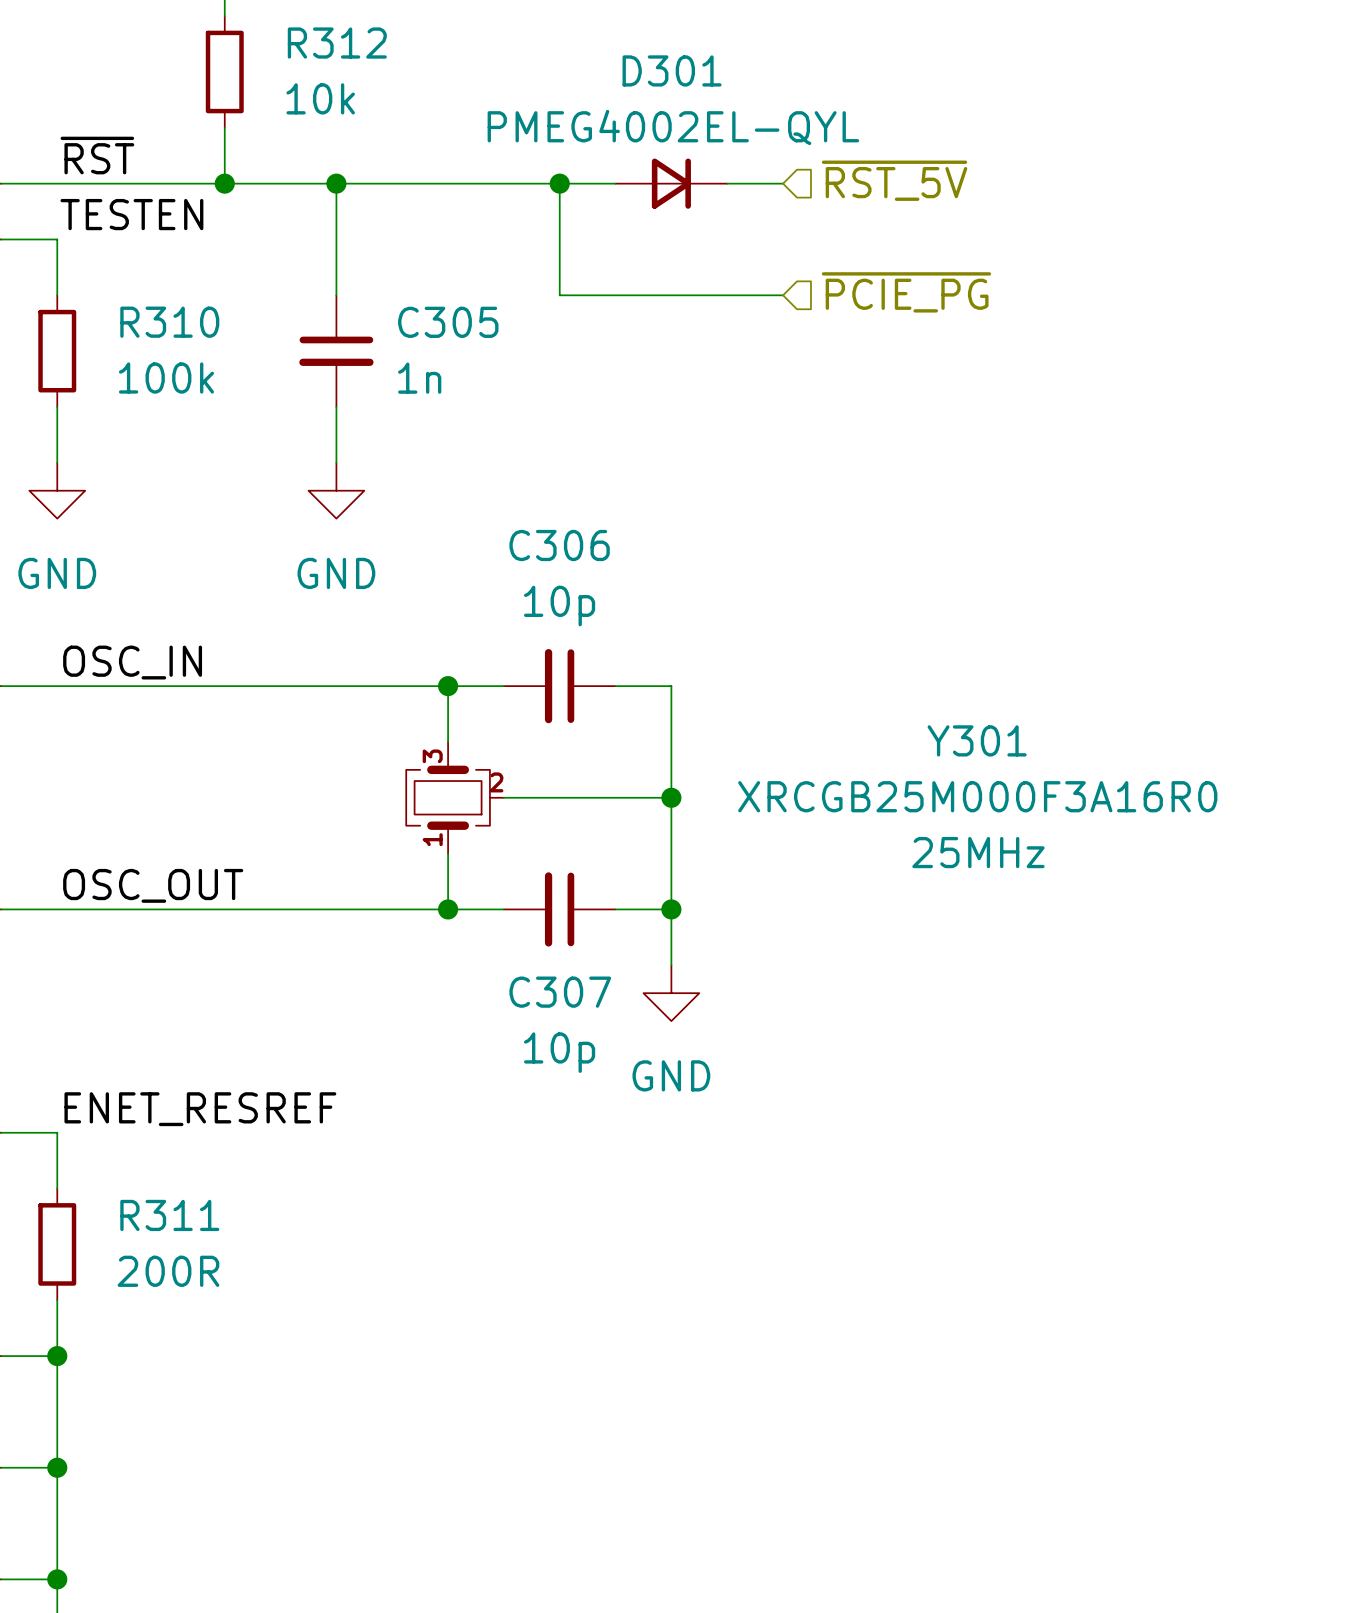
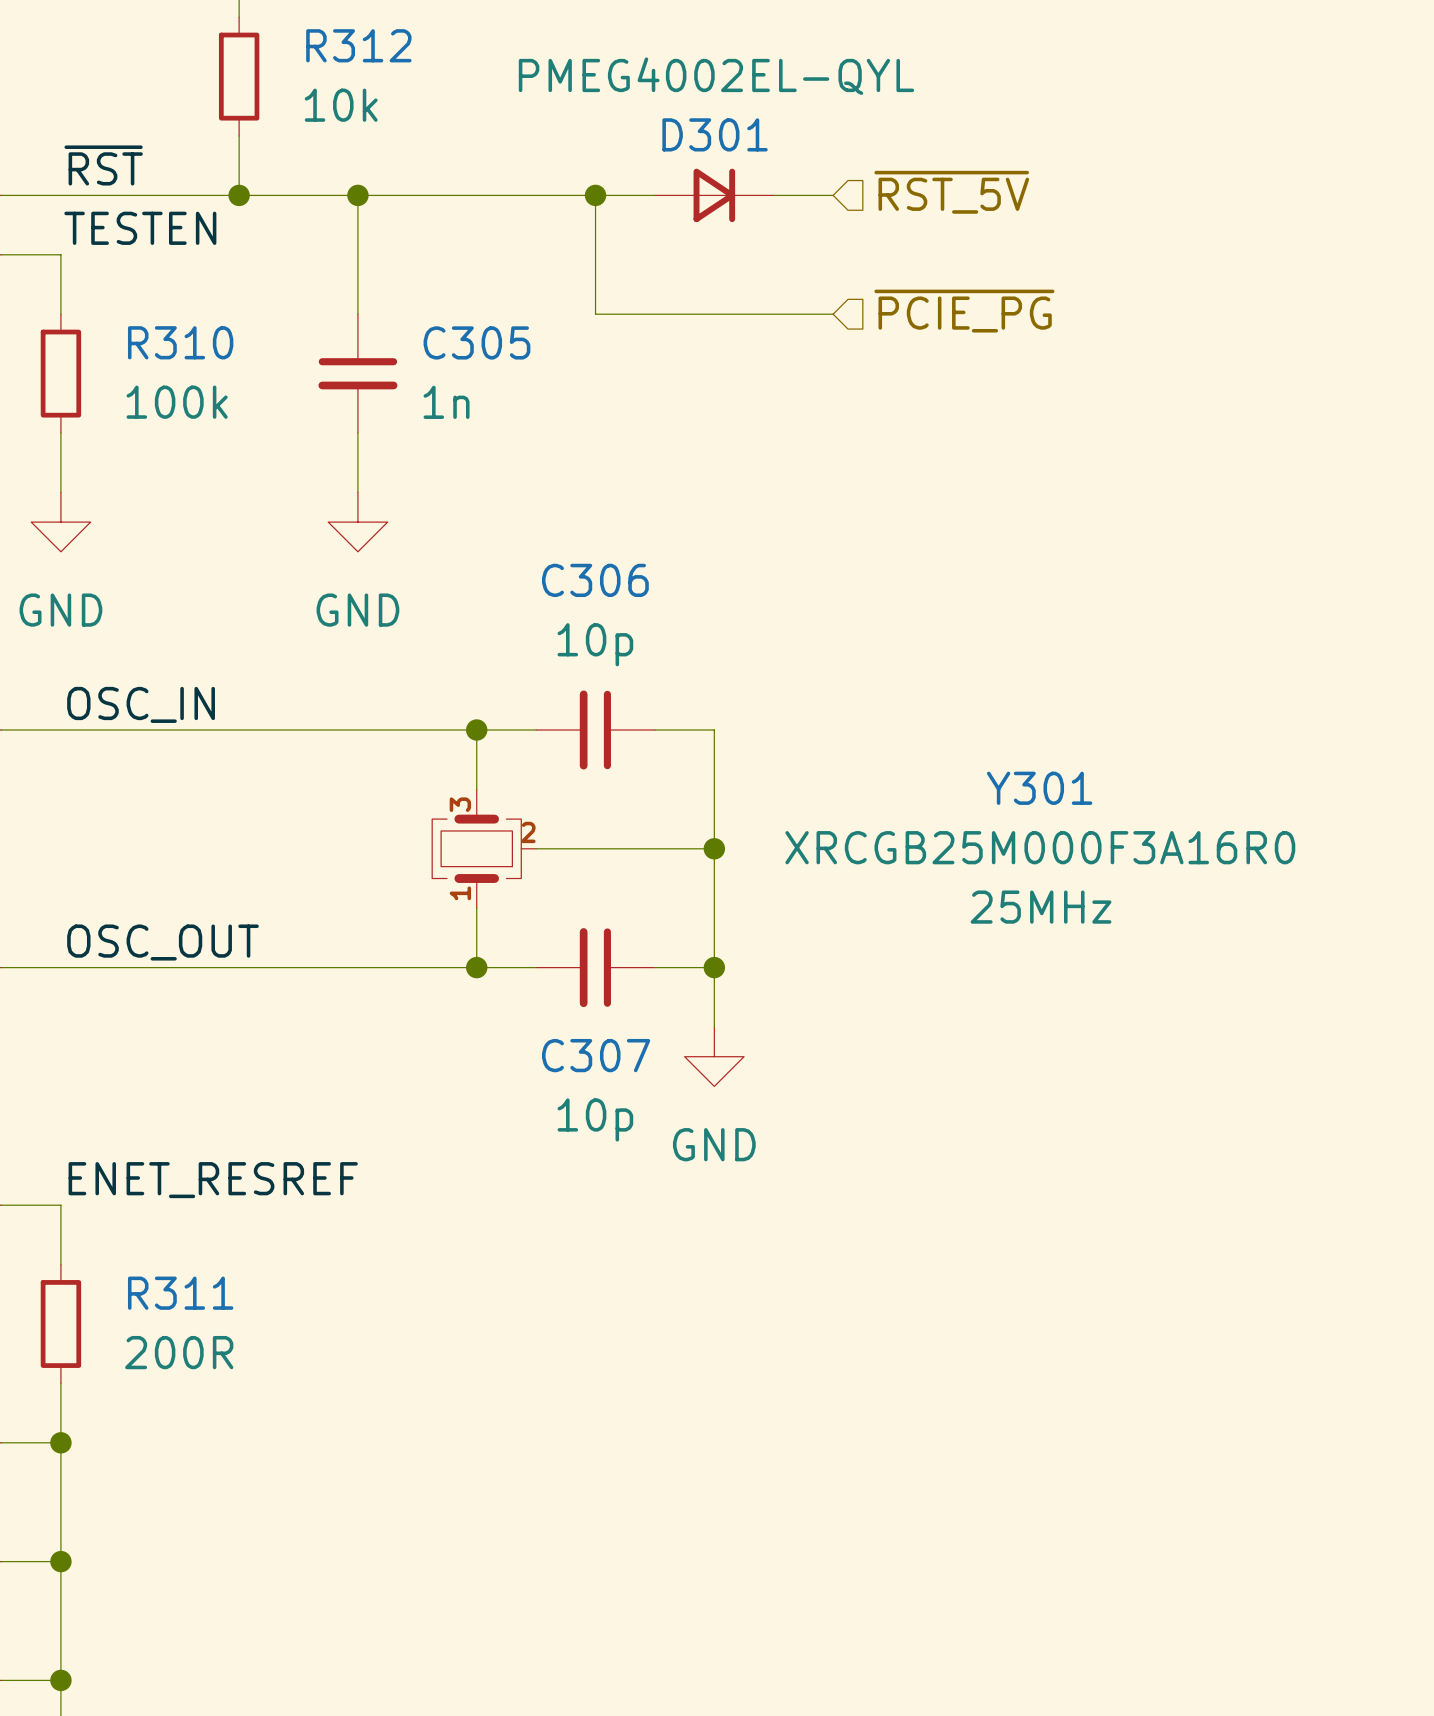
D301 name position: D301 (672, 70) -> D301 (715, 134)
D301 value position: PMEG4002EL-QYL (673, 127) -> PMEG4002EL-QYL (716, 76)

